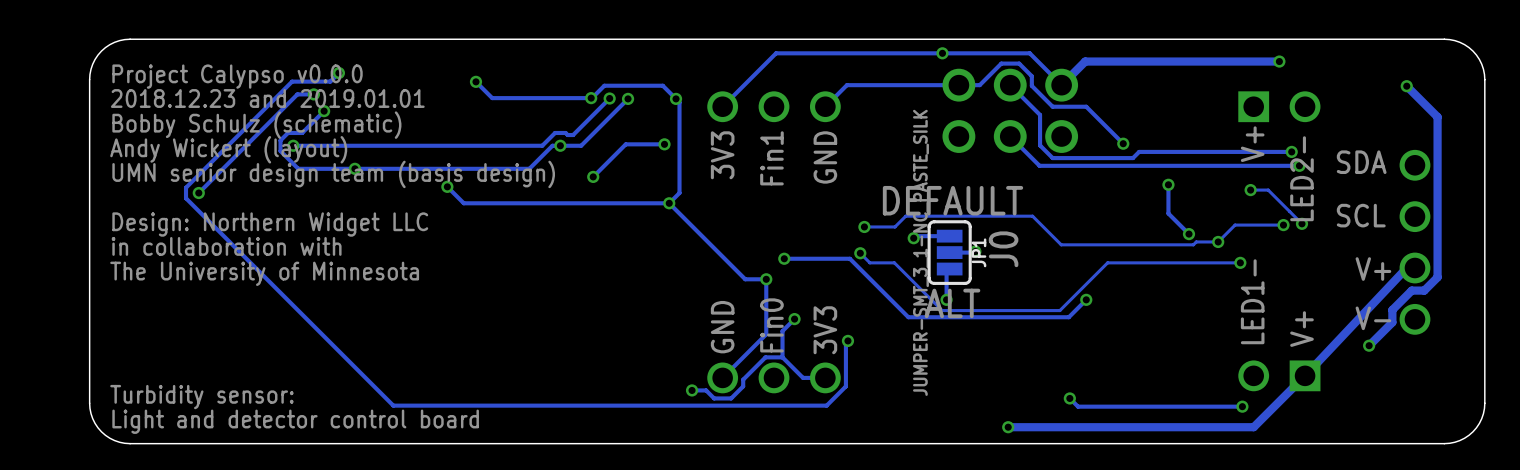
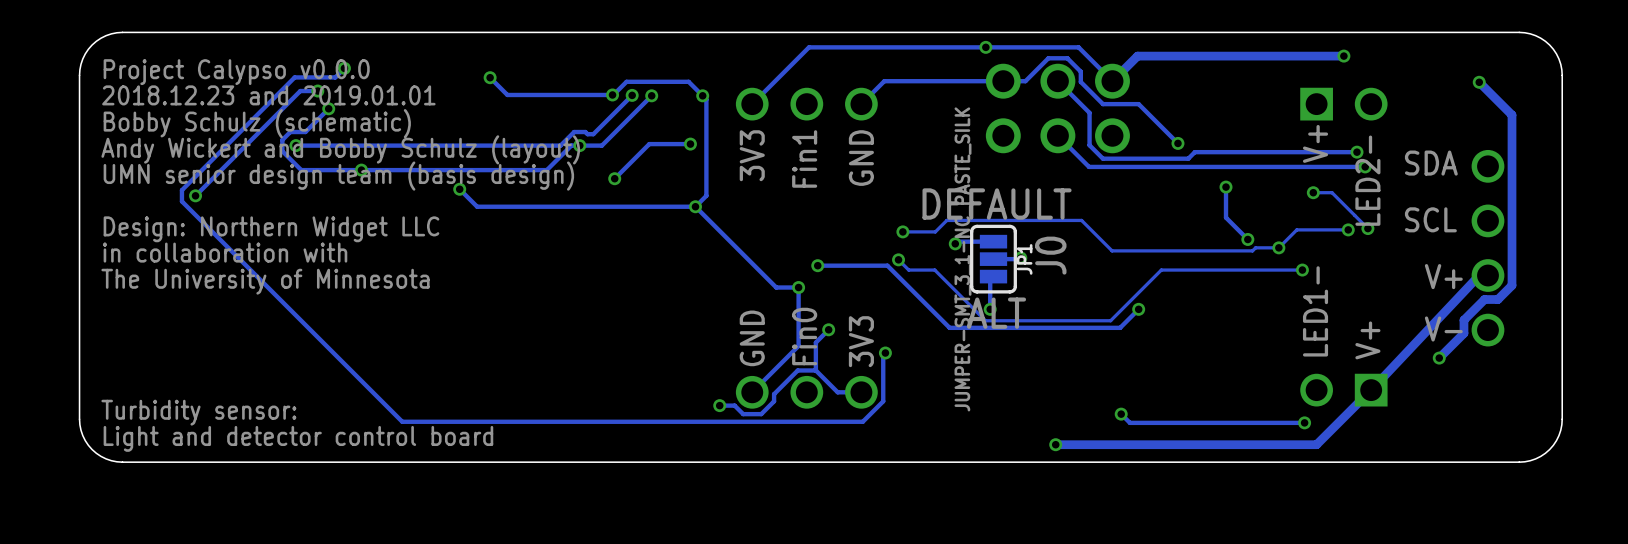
text: Andy Wickert (layout) (228, 149) -> Andy Wickert and Bobby Schulz (layout) (340, 149)

